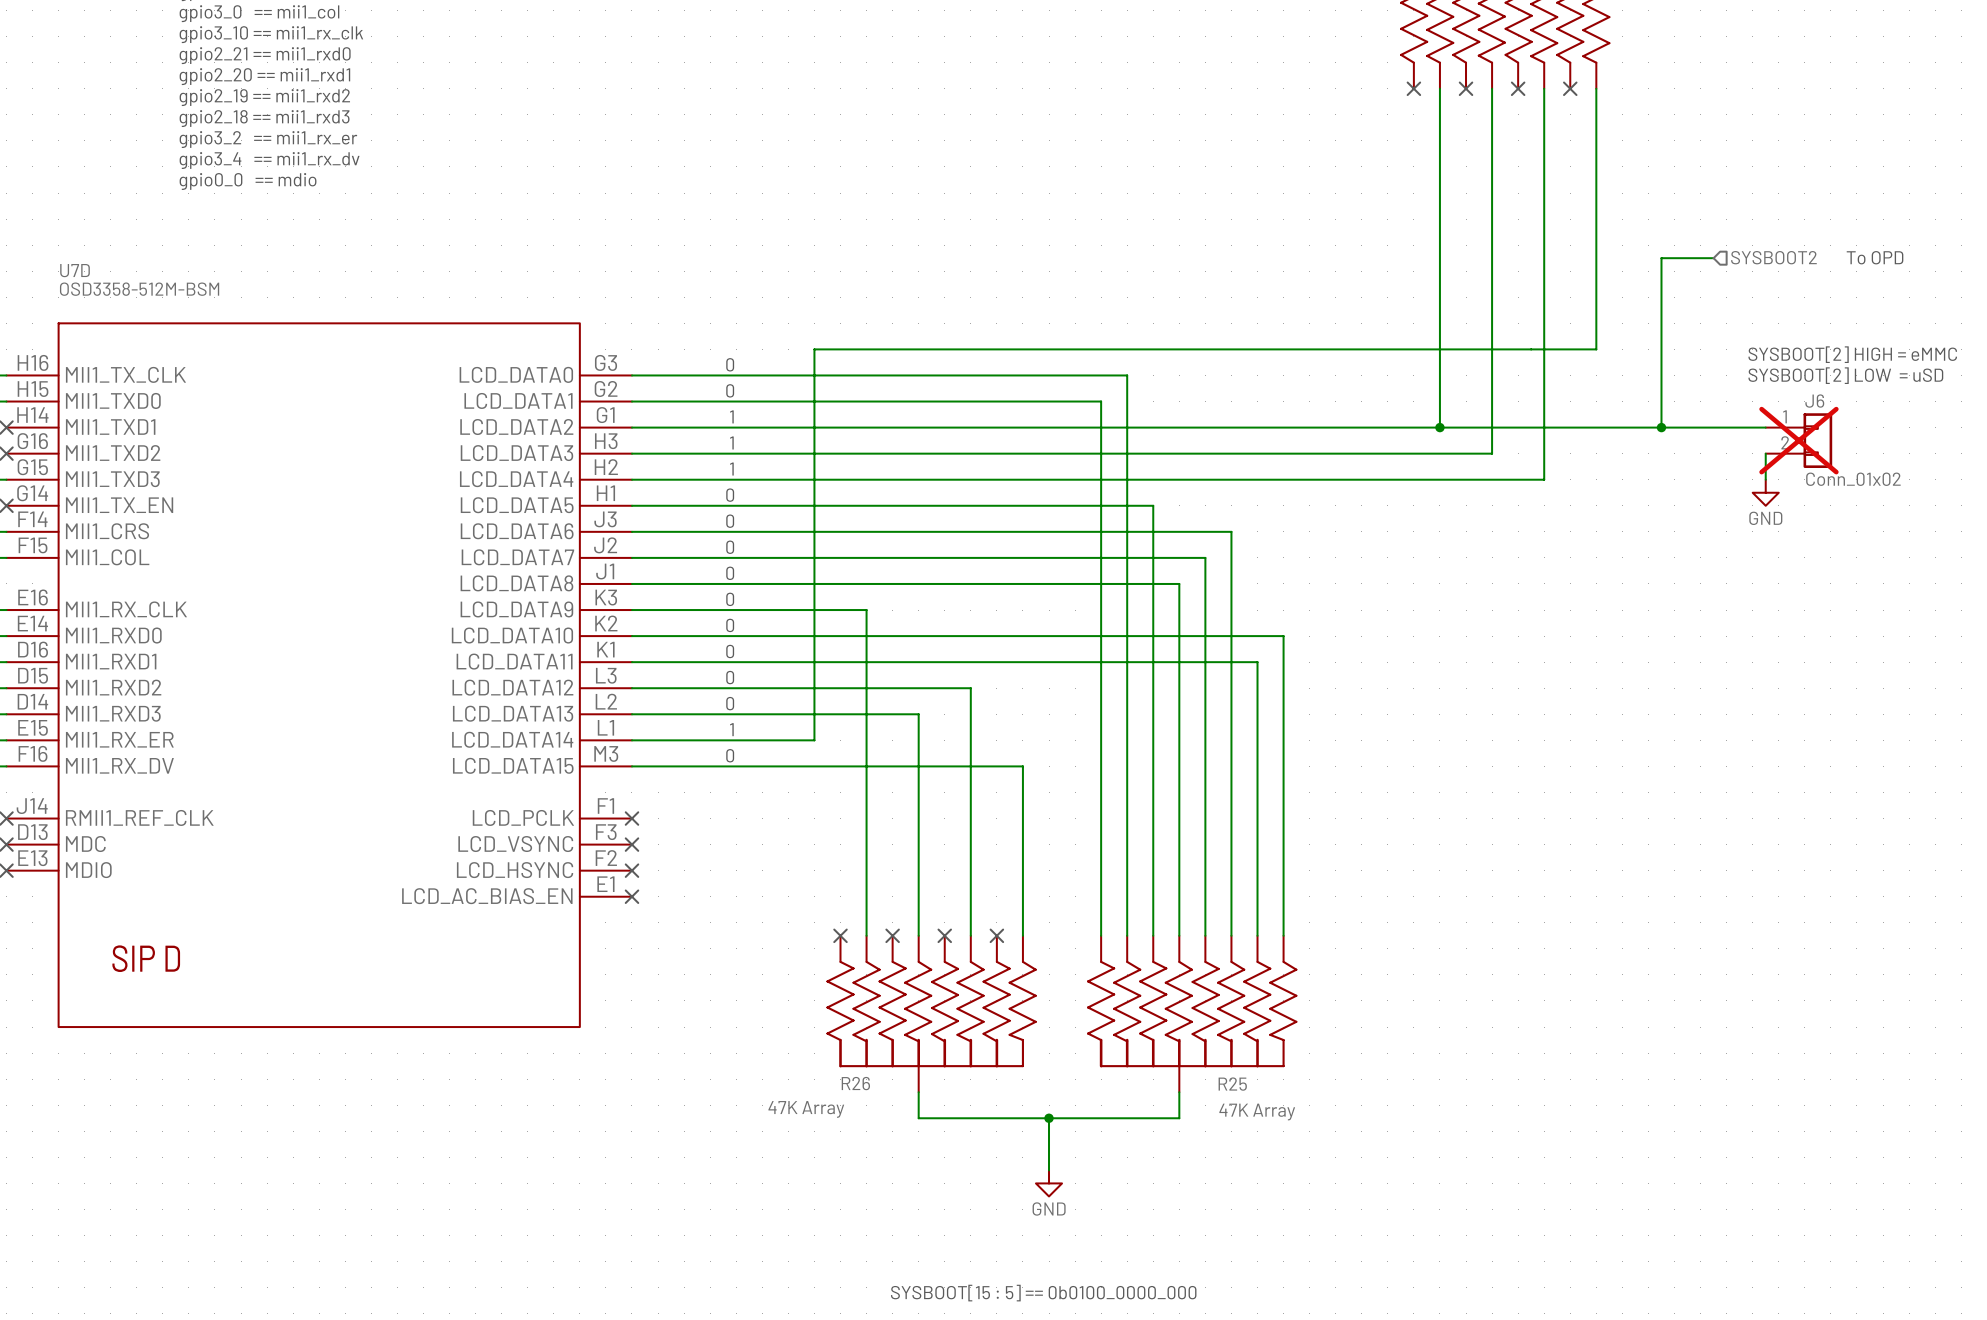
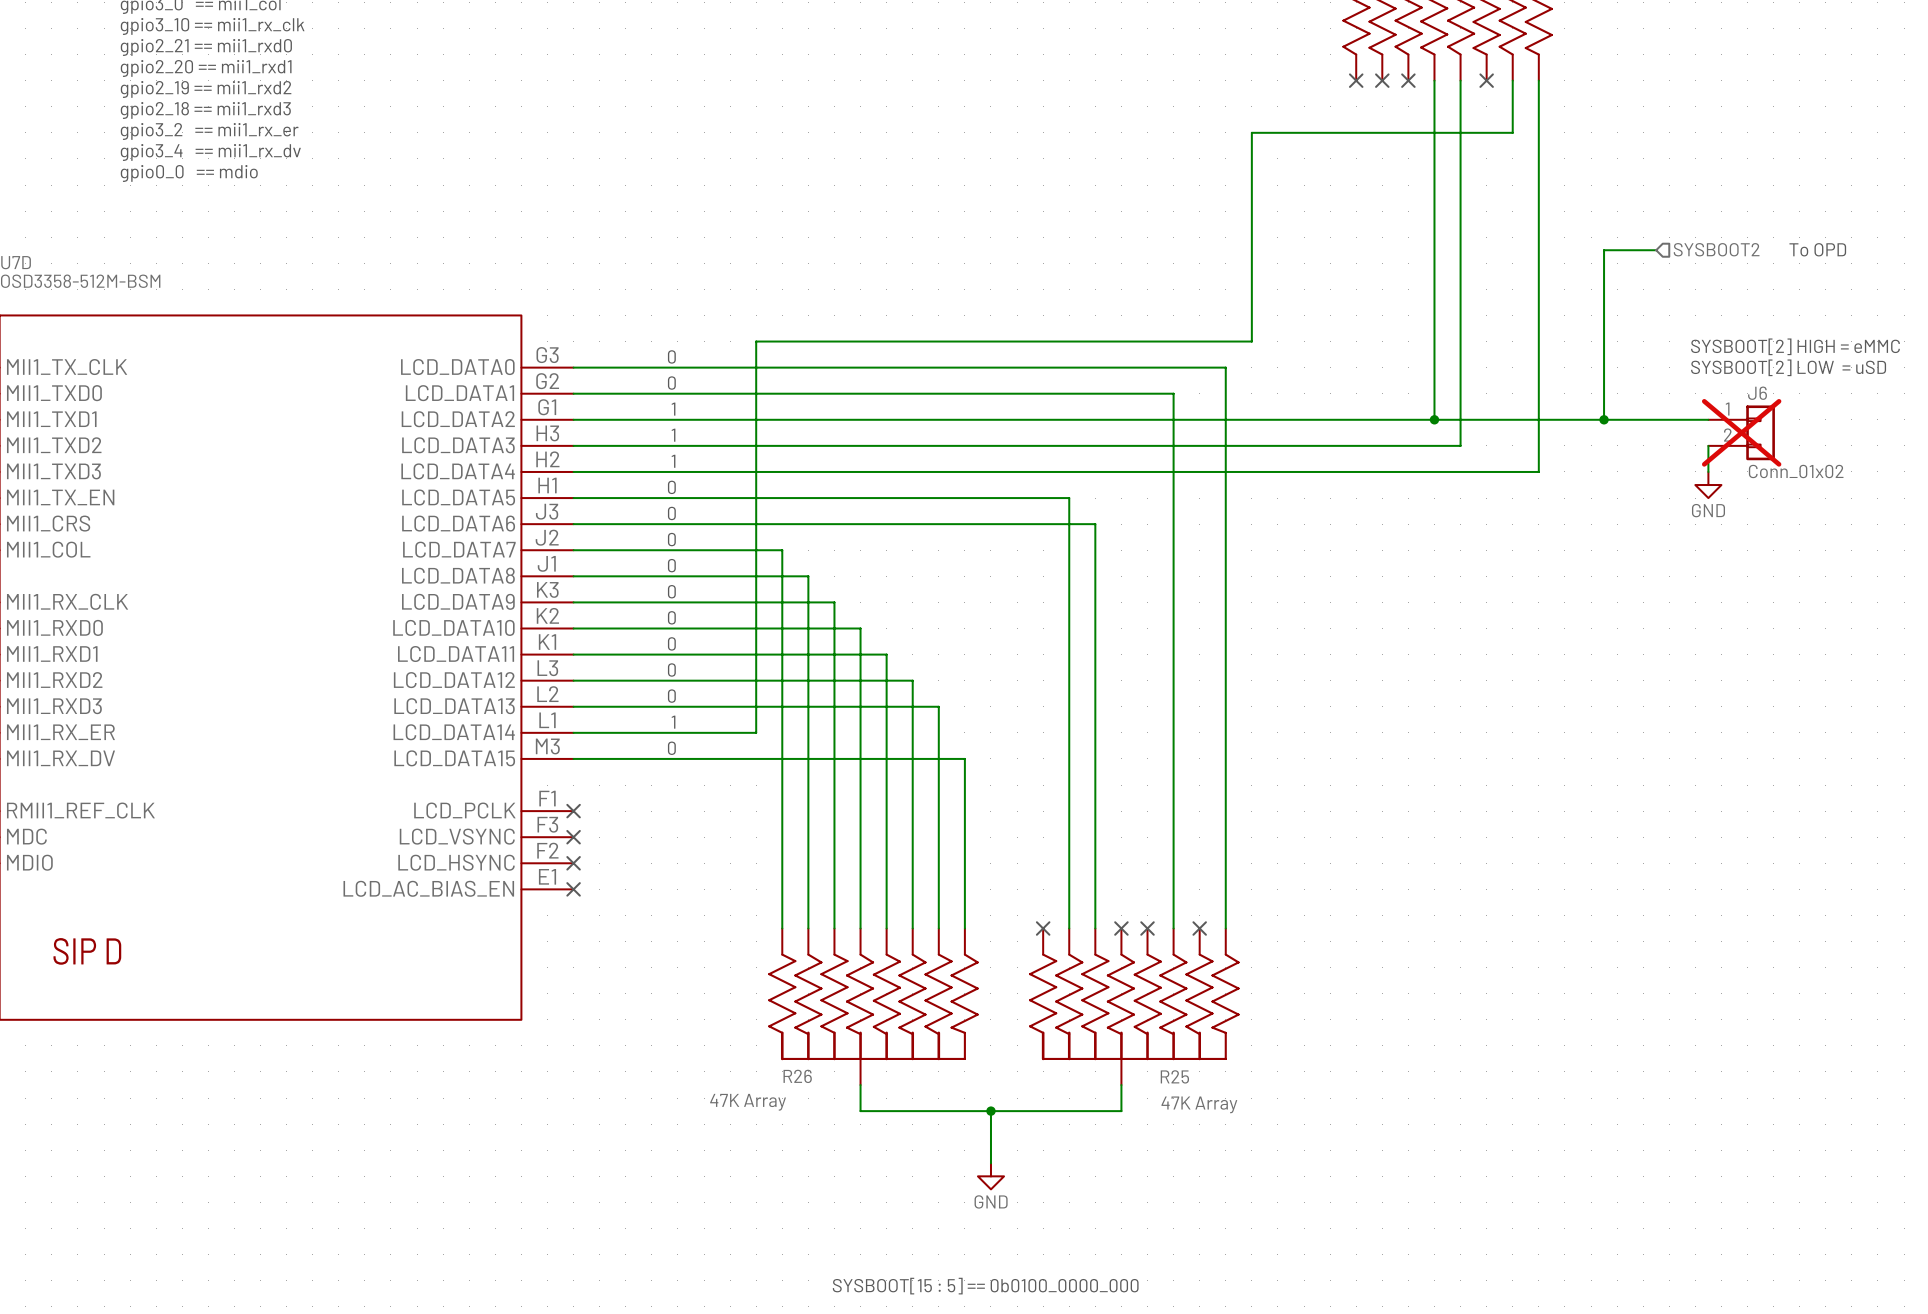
wire: (1439, 88) (1439, 427) -> none
no-connect mark: none -> (1382, 80)
no-connect mark: (1518, 88) -> none
wire: (1544, 88) (1544, 479) -> (1538, 341) (1538, 471) (1486, 471)
no-connect mark: none -> (1486, 80)
no-connect mark: (1570, 88) -> none
wire: (1309, 349) (1596, 349) -> (1251, 341) (1251, 132) (1512, 132) (1512, 80)
wire: (1127, 375) (1127, 505) (1153, 505) (1153, 531) (1231, 531) -> (1043, 393) (1173, 393) (1173, 524)
wire: (1101, 401) (1101, 935) -> none
junction position: (1439, 427) -> (1434, 419)
wire: (1492, 427) (1492, 453) -> (1460, 80) (1460, 445) (1434, 445)
wire: (840, 557) (1205, 557) (1205, 935) -> (782, 550) (782, 928)
wire: (866, 583) (1179, 583) (1179, 935) -> (808, 576) (808, 602) (834, 602) (834, 928)
wire: (918, 636) (1283, 636) -> (1069, 367) (1225, 367) (1225, 628)
wire: none -> (860, 628) (860, 706) (938, 706) (938, 928)
wire: (944, 662) (1257, 662) (1257, 935) -> (886, 654) (886, 928)
no-connect mark: (840, 935) -> none
no-connect mark: (892, 935) -> none
no-connect mark: (944, 935) -> none
no-connect mark: (996, 935) -> none
no-connect mark: none -> (1043, 928)
no-connect mark: none -> (1121, 928)
no-connect mark: none -> (1147, 928)
no-connect mark: none -> (1199, 928)

